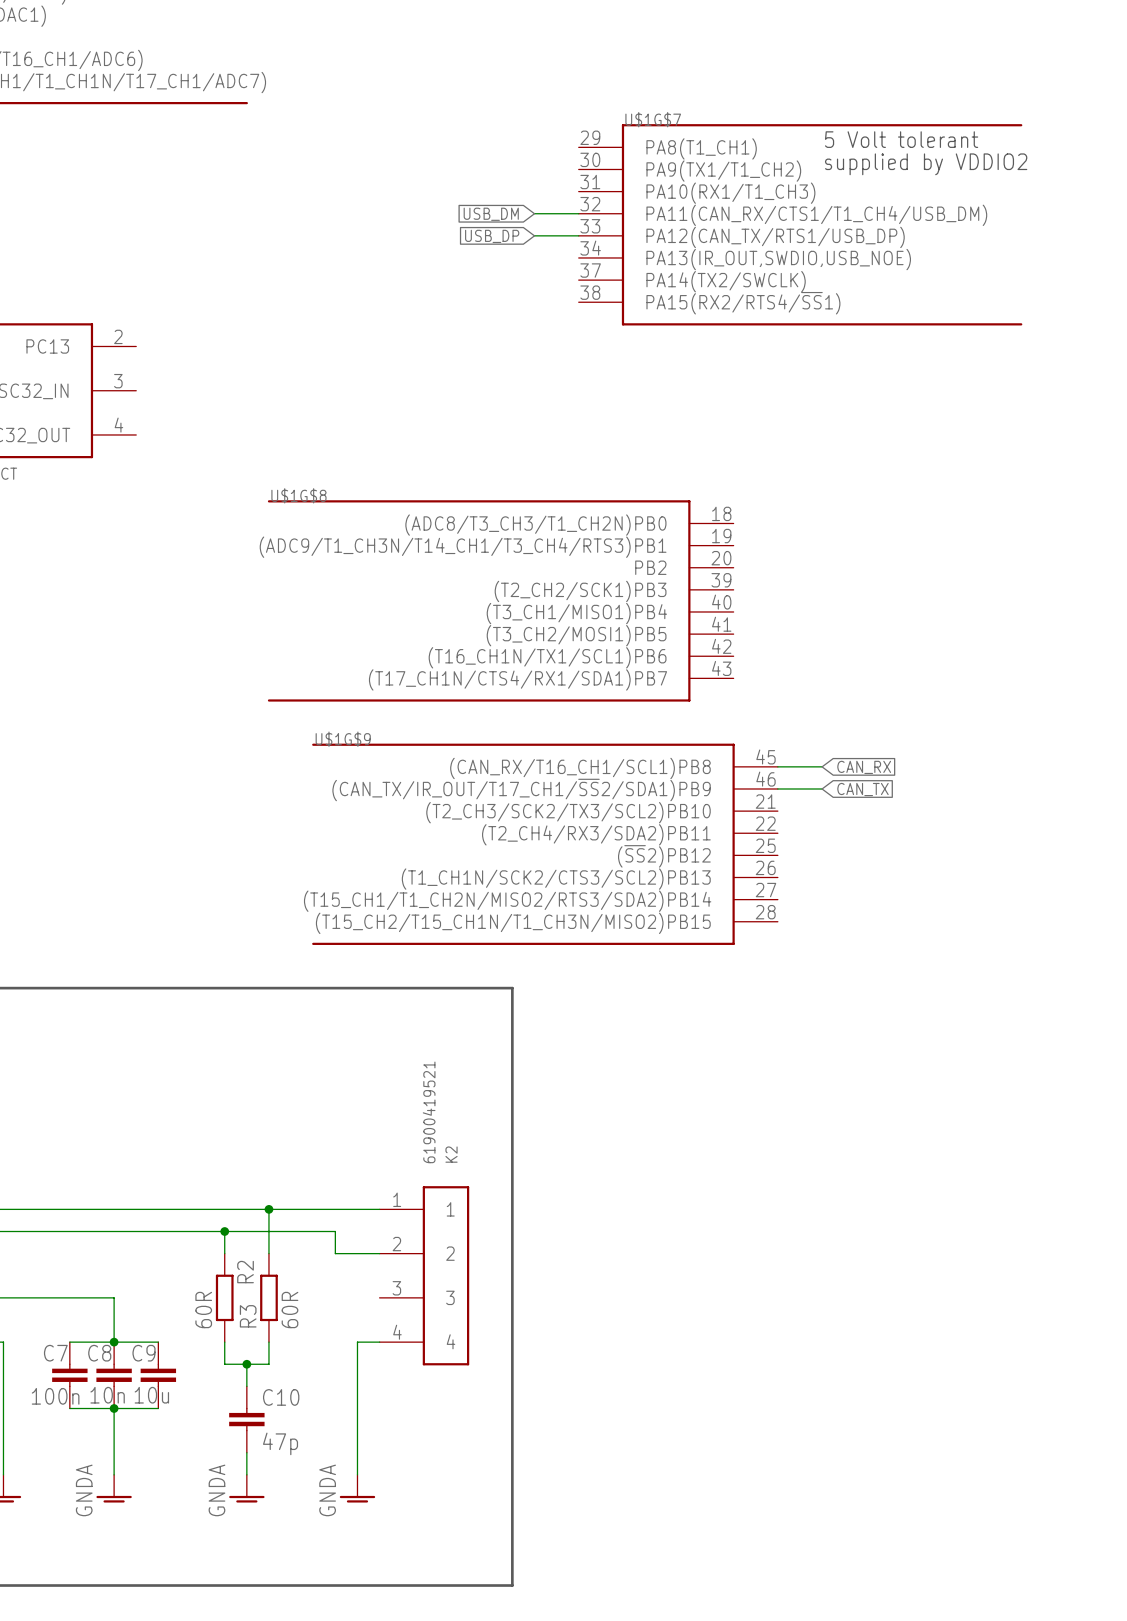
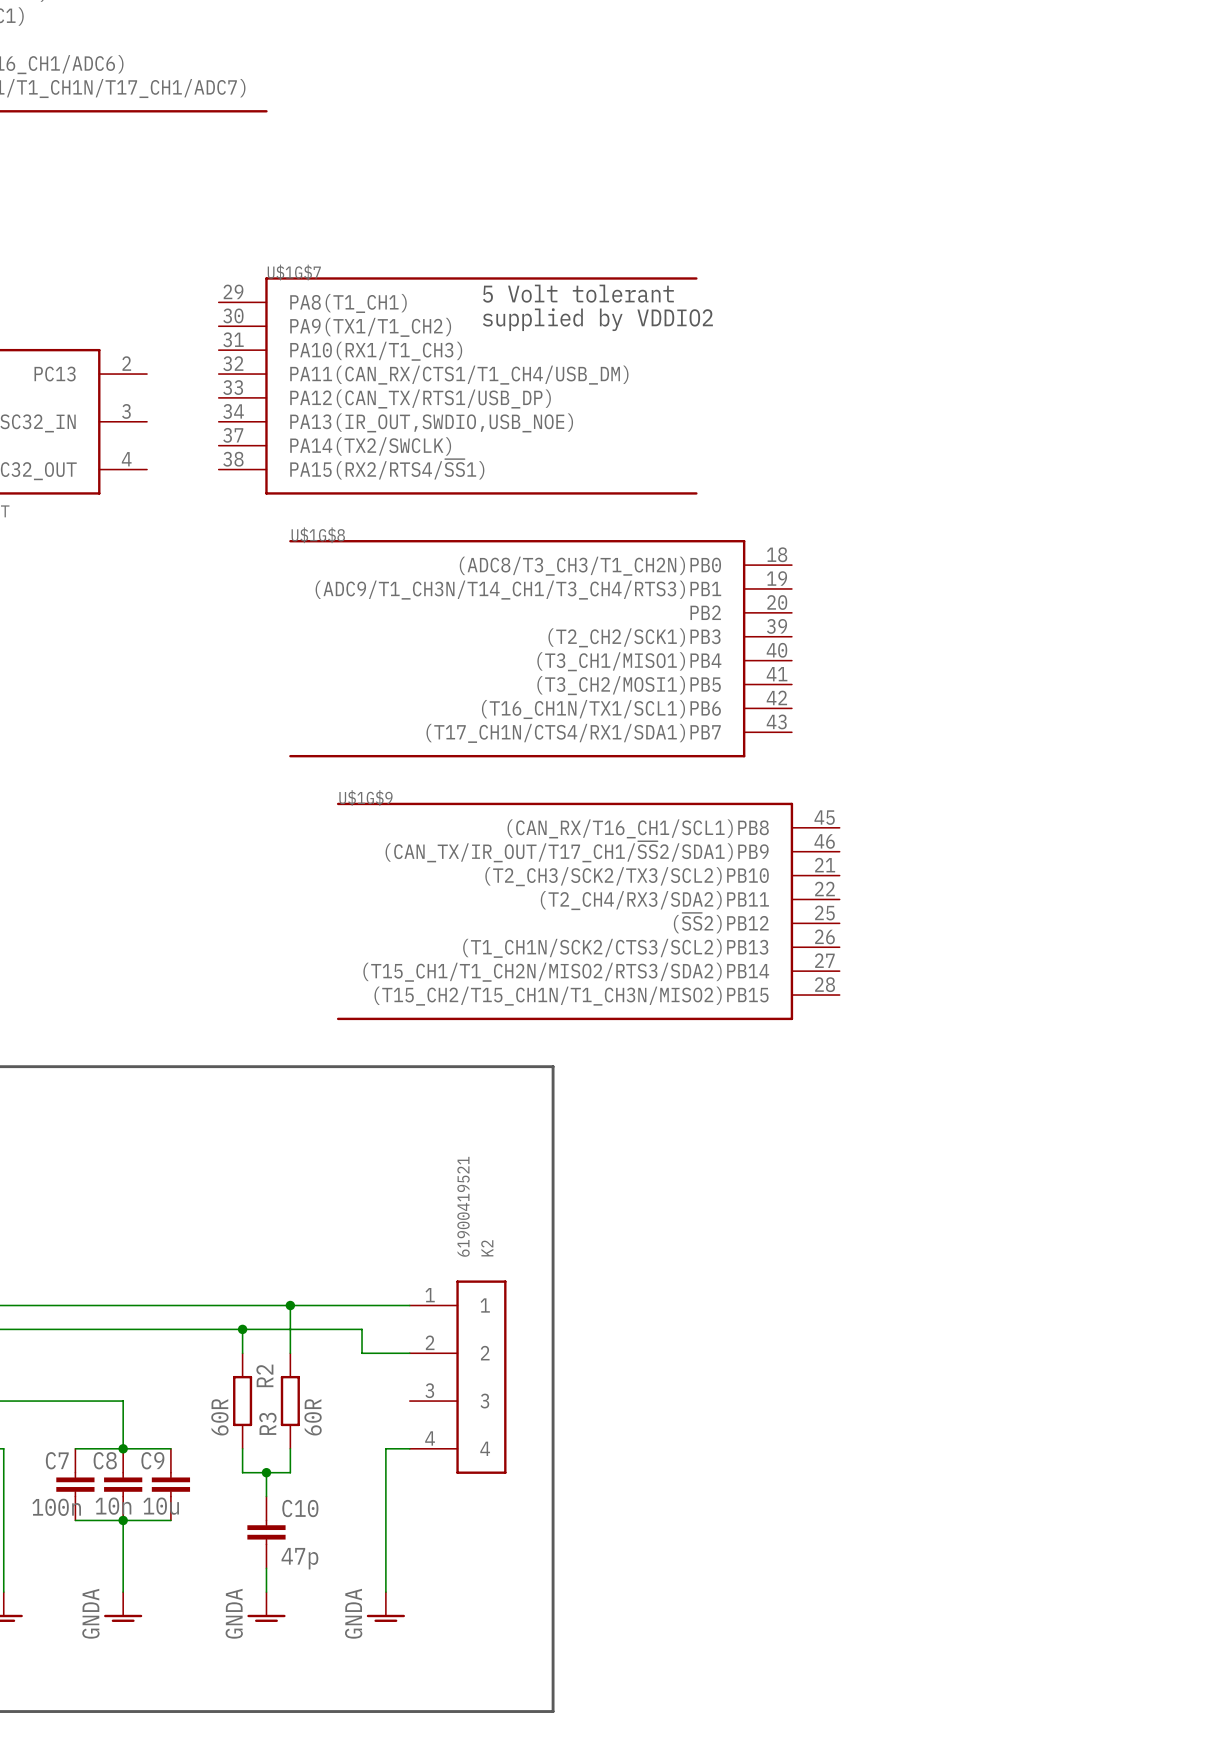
wire: (534, 213) (578, 213) -> none
global label: USB_DM (491, 214) -> none
U$1G$7 position: (800, 224) -> (458, 385)
wire: (534, 235) (578, 235) -> none
global label: USB_DP (492, 236) -> none
wire: (777, 766) (822, 766) -> none
global label: CAN_RX (864, 767) -> none
wire: (777, 788) (822, 788) -> none
global label: CAN_TX (863, 789) -> none

